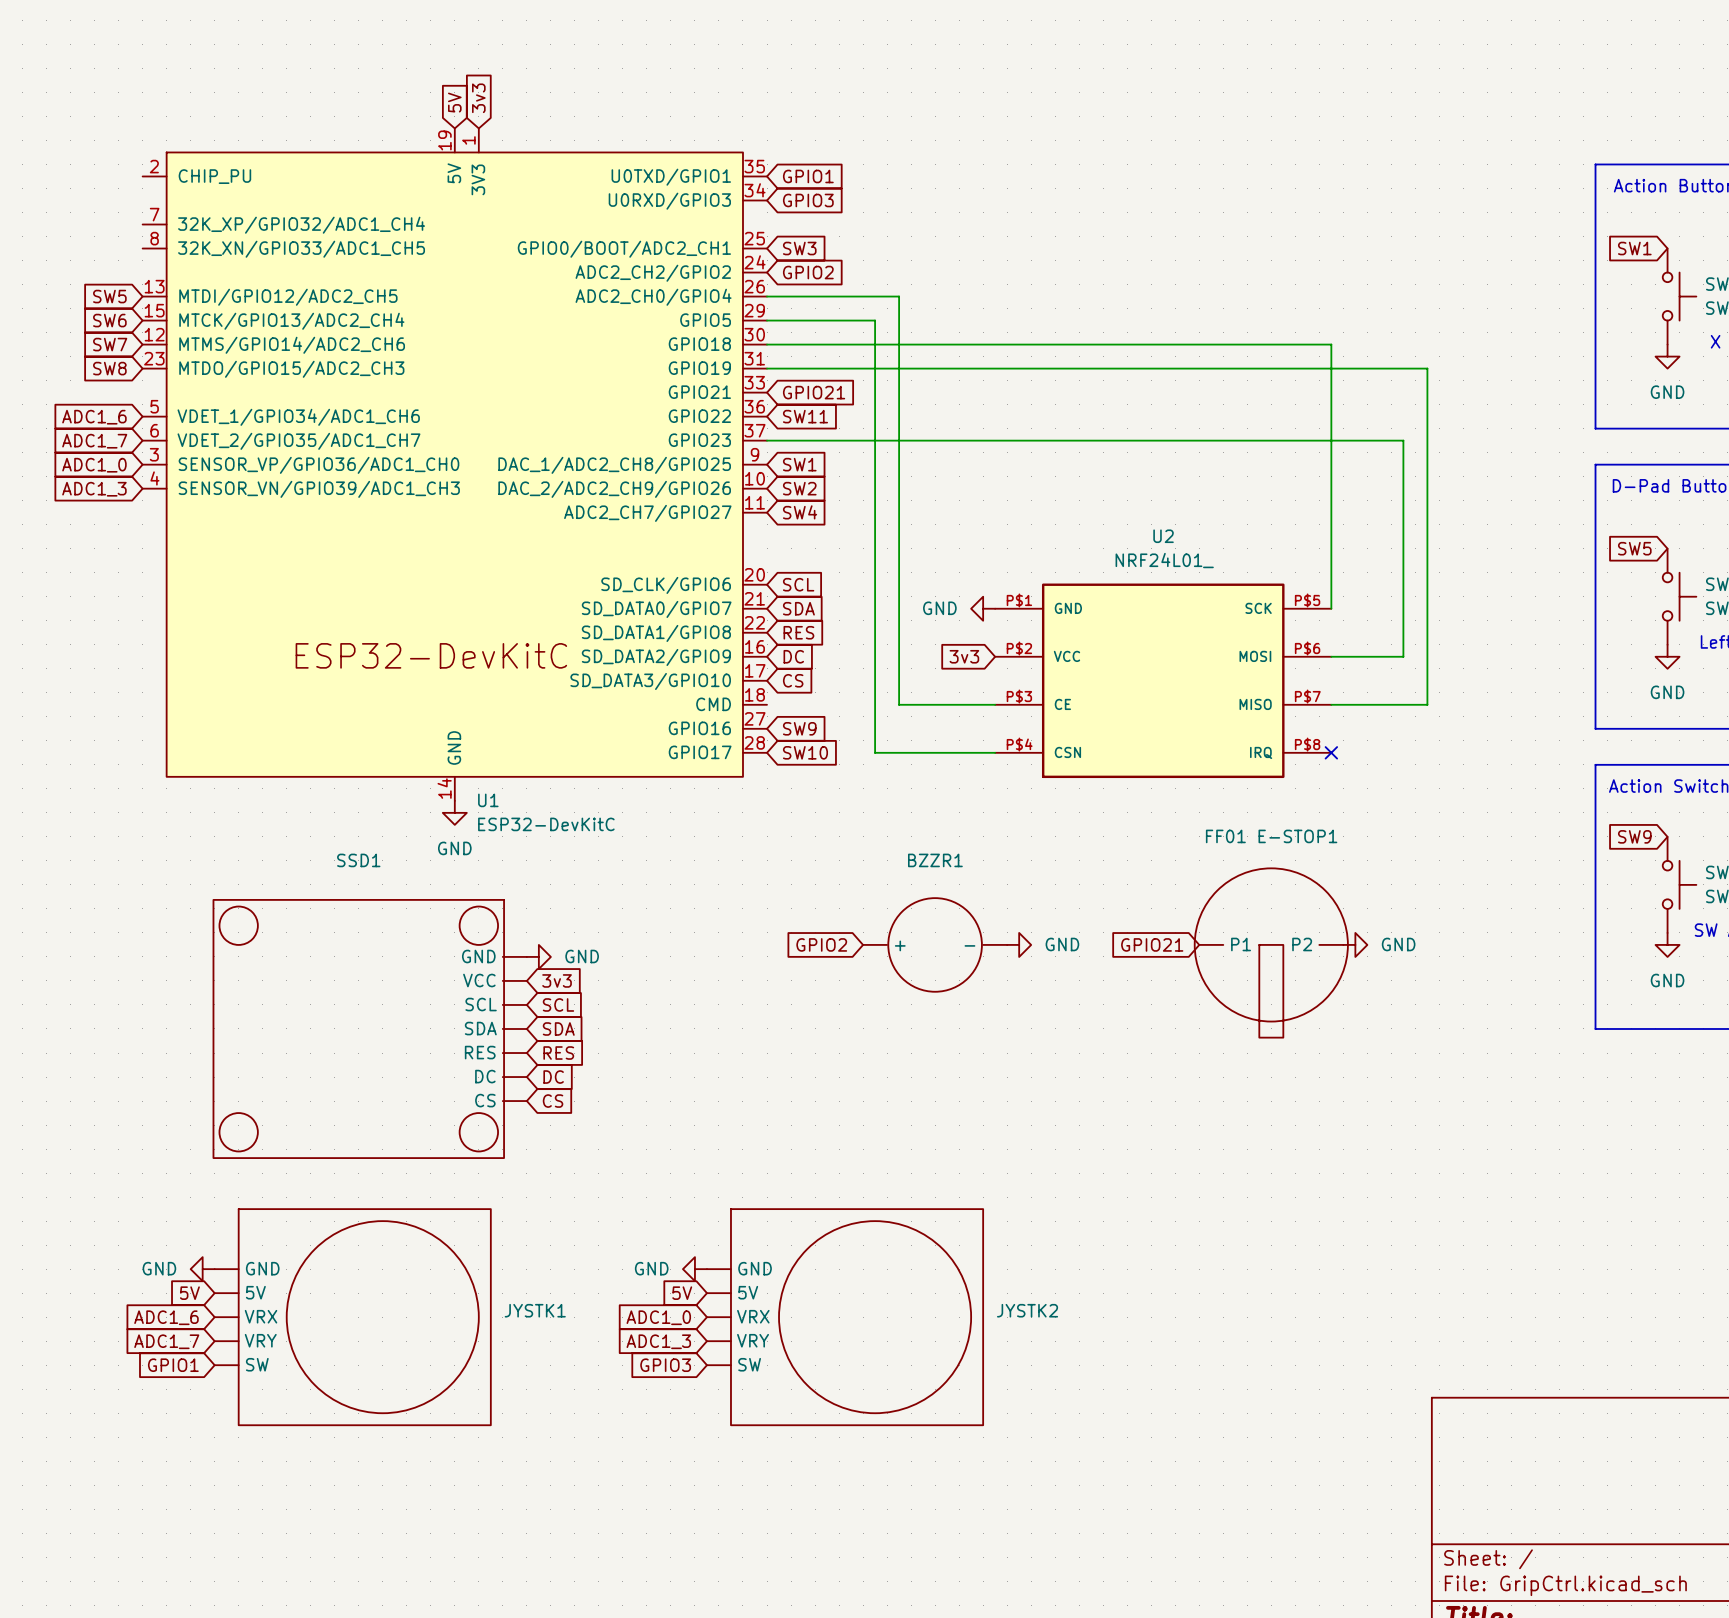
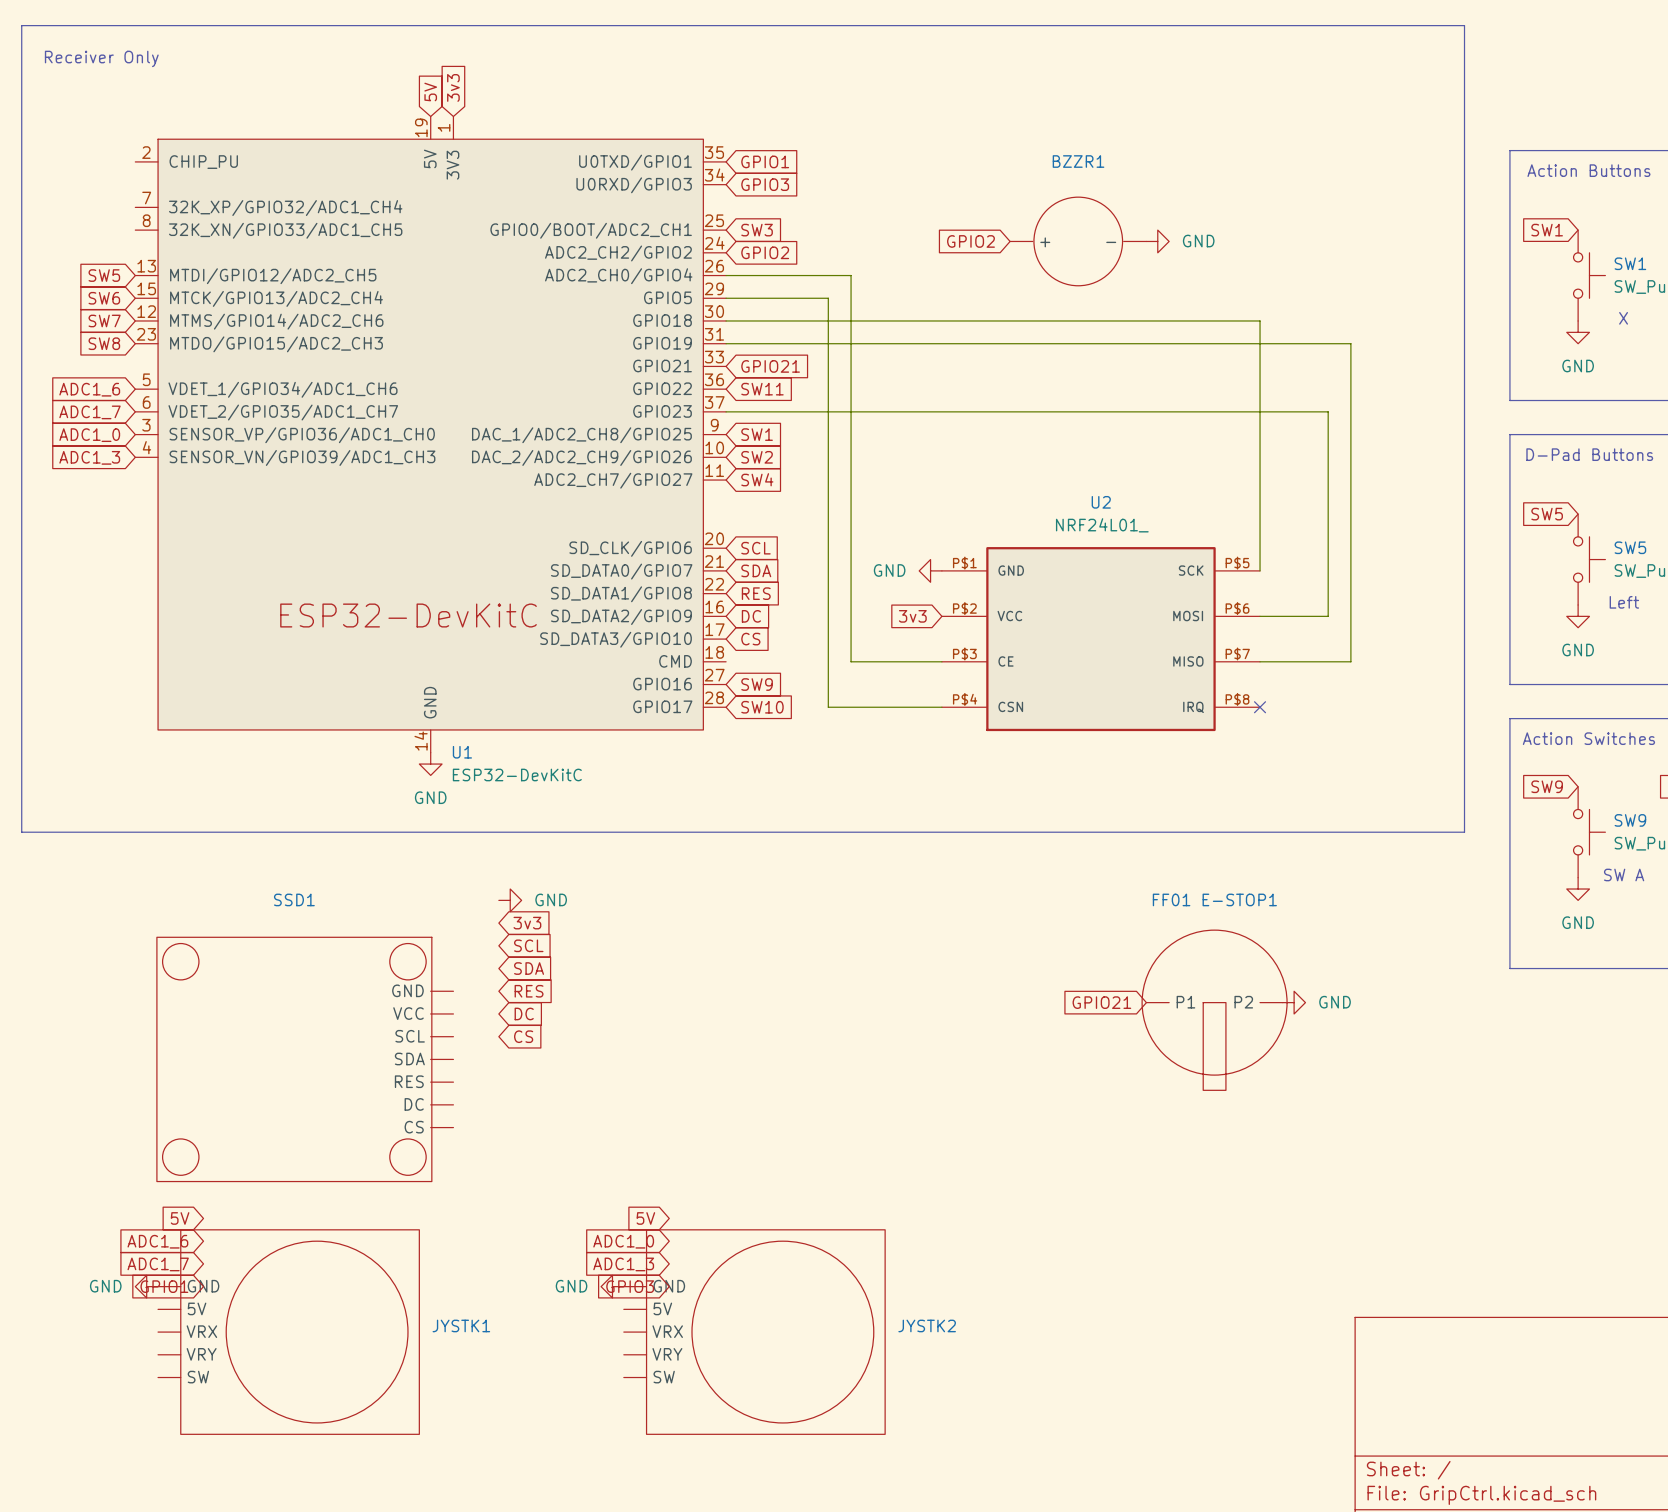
line: none -> (21, 25) (1464, 25) (1464, 832) (21, 832) (21, 25)
text: none -> Receiver Only (101, 58)
global label: none -> GPIO2 (970, 241)
power symbol: none -> GND (1157, 241)
global label: GPIO2 (821, 944) -> none
BZZR1 position: (935, 944) -> (1078, 241)
power symbol: GND (1019, 944) -> none
global label position: GPIO21 (1152, 944) -> GPIO21 (1101, 1002)
power symbol position: GND (1355, 944) -> GND (1294, 1002)
FF01 E-STOP1 position: (1271, 952) -> (1214, 1010)
SSD1 position: (370, 1028) -> (305, 1059)
power symbol position: GND (202, 1269) -> GND (146, 1286)
power symbol position: GND (694, 1269) -> GND (612, 1286)
JYSTK1 position: (352, 1317) -> (288, 1332)
JYSTK2 position: (845, 1317) -> (754, 1332)

